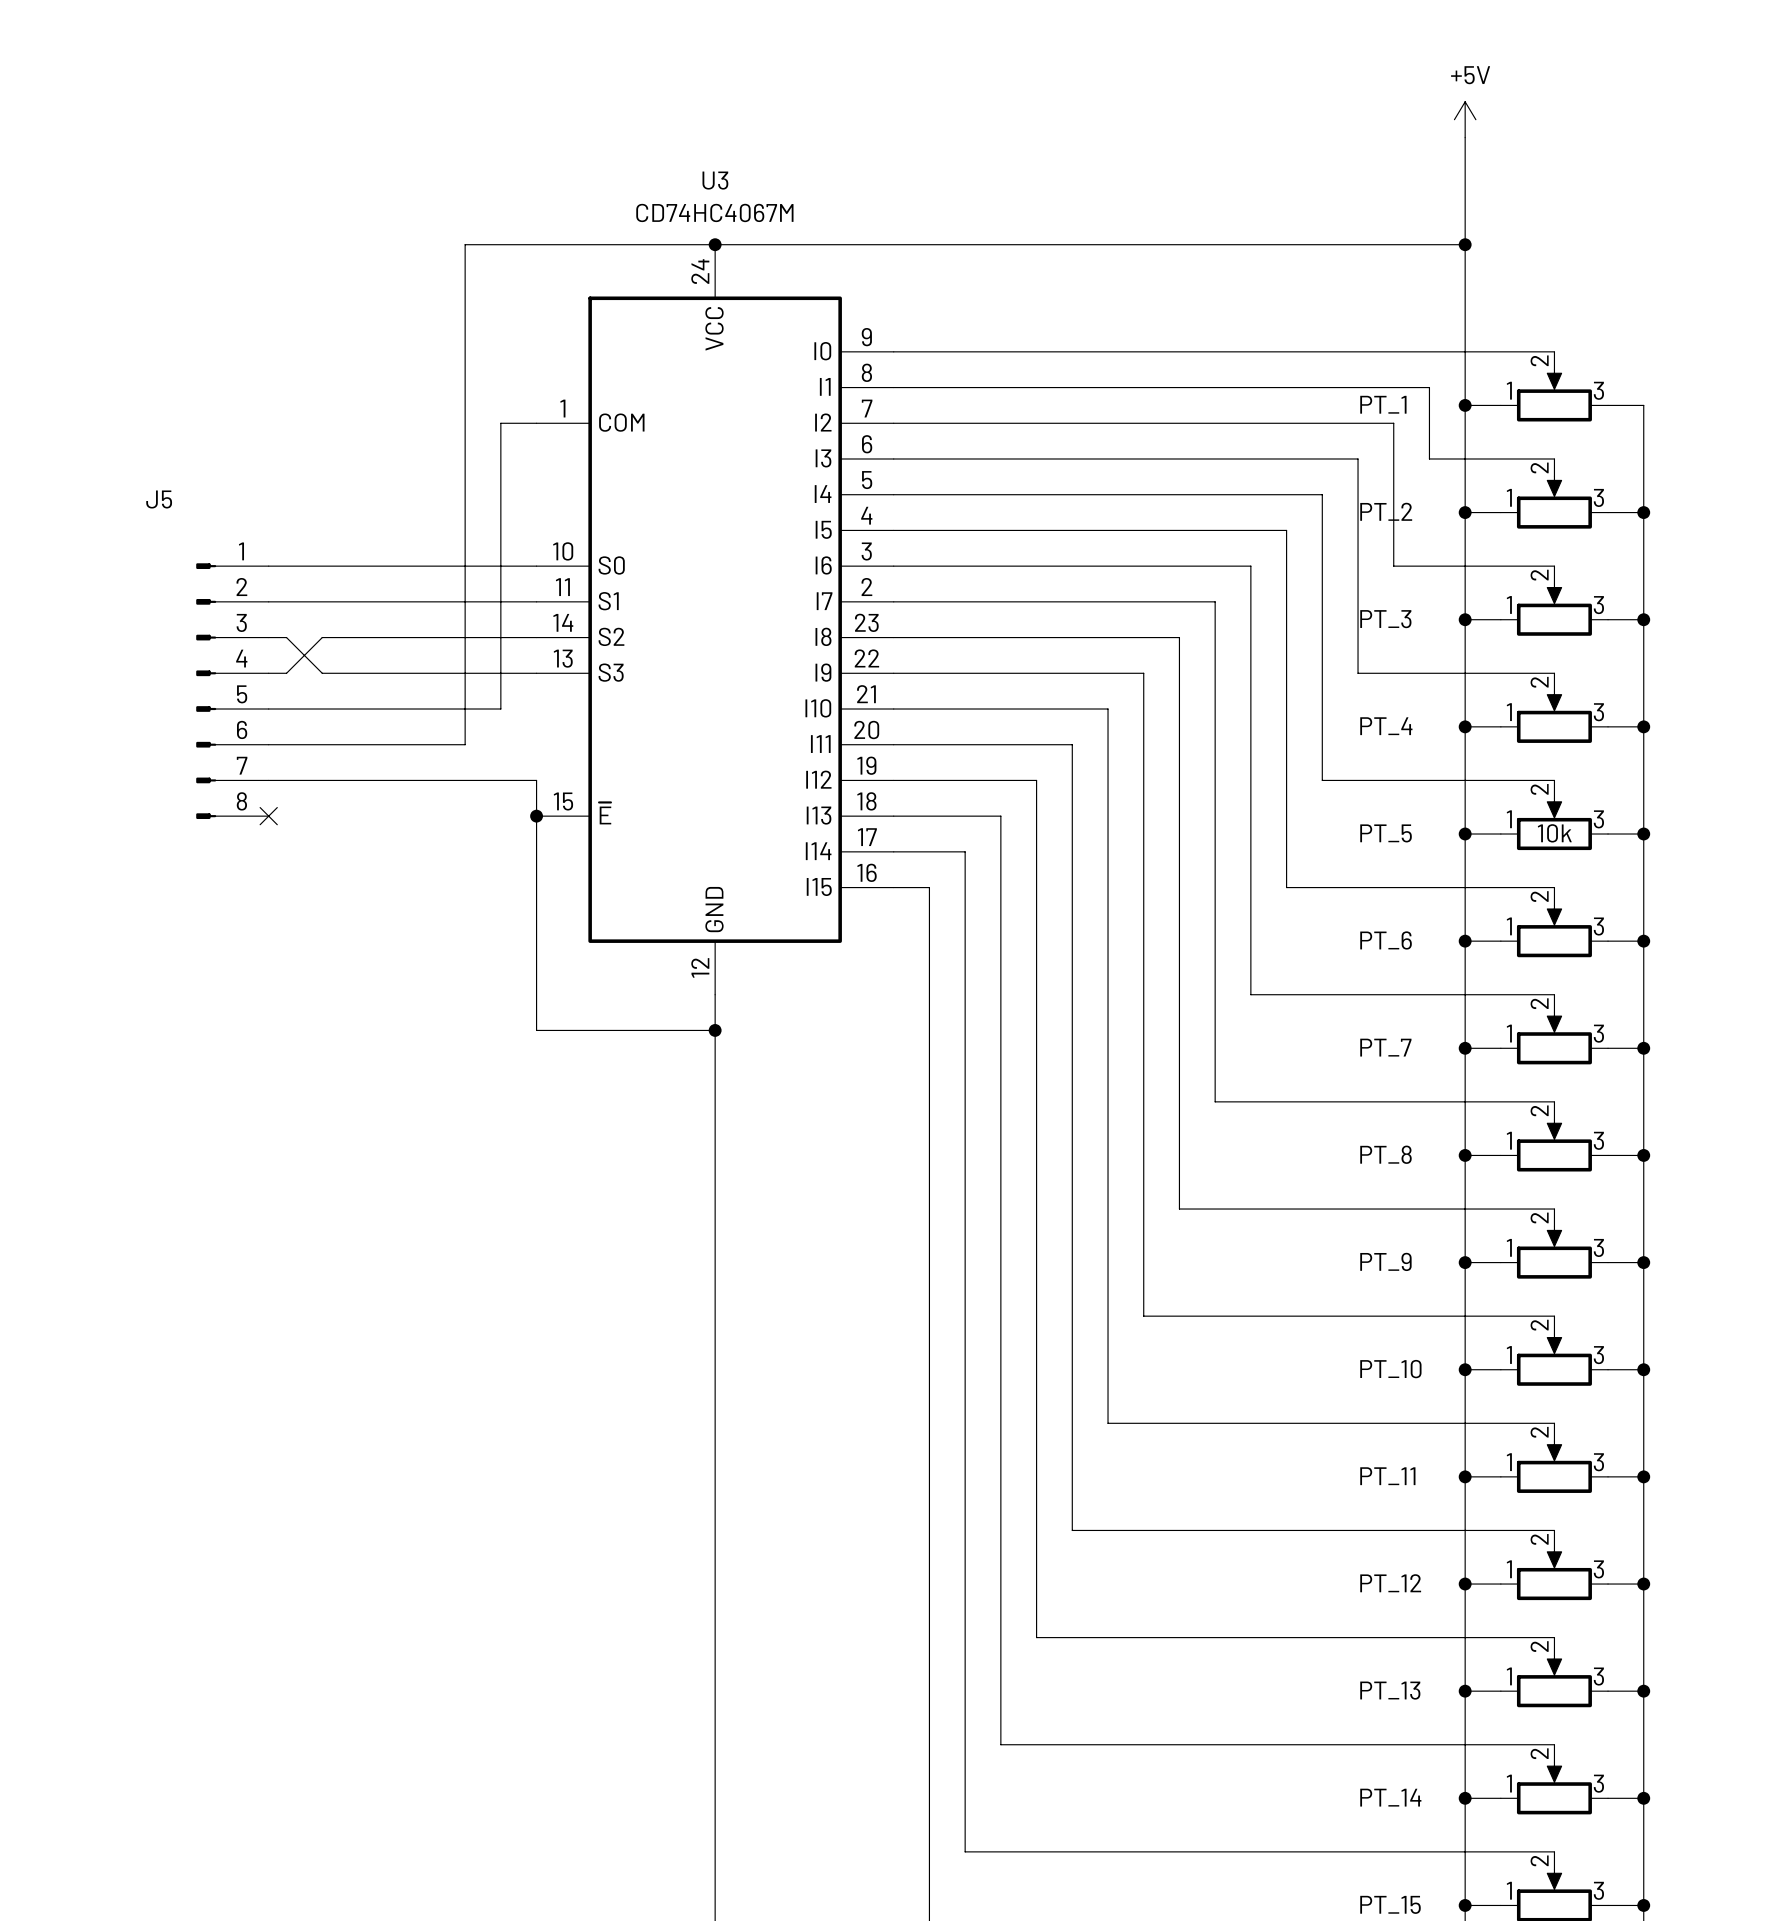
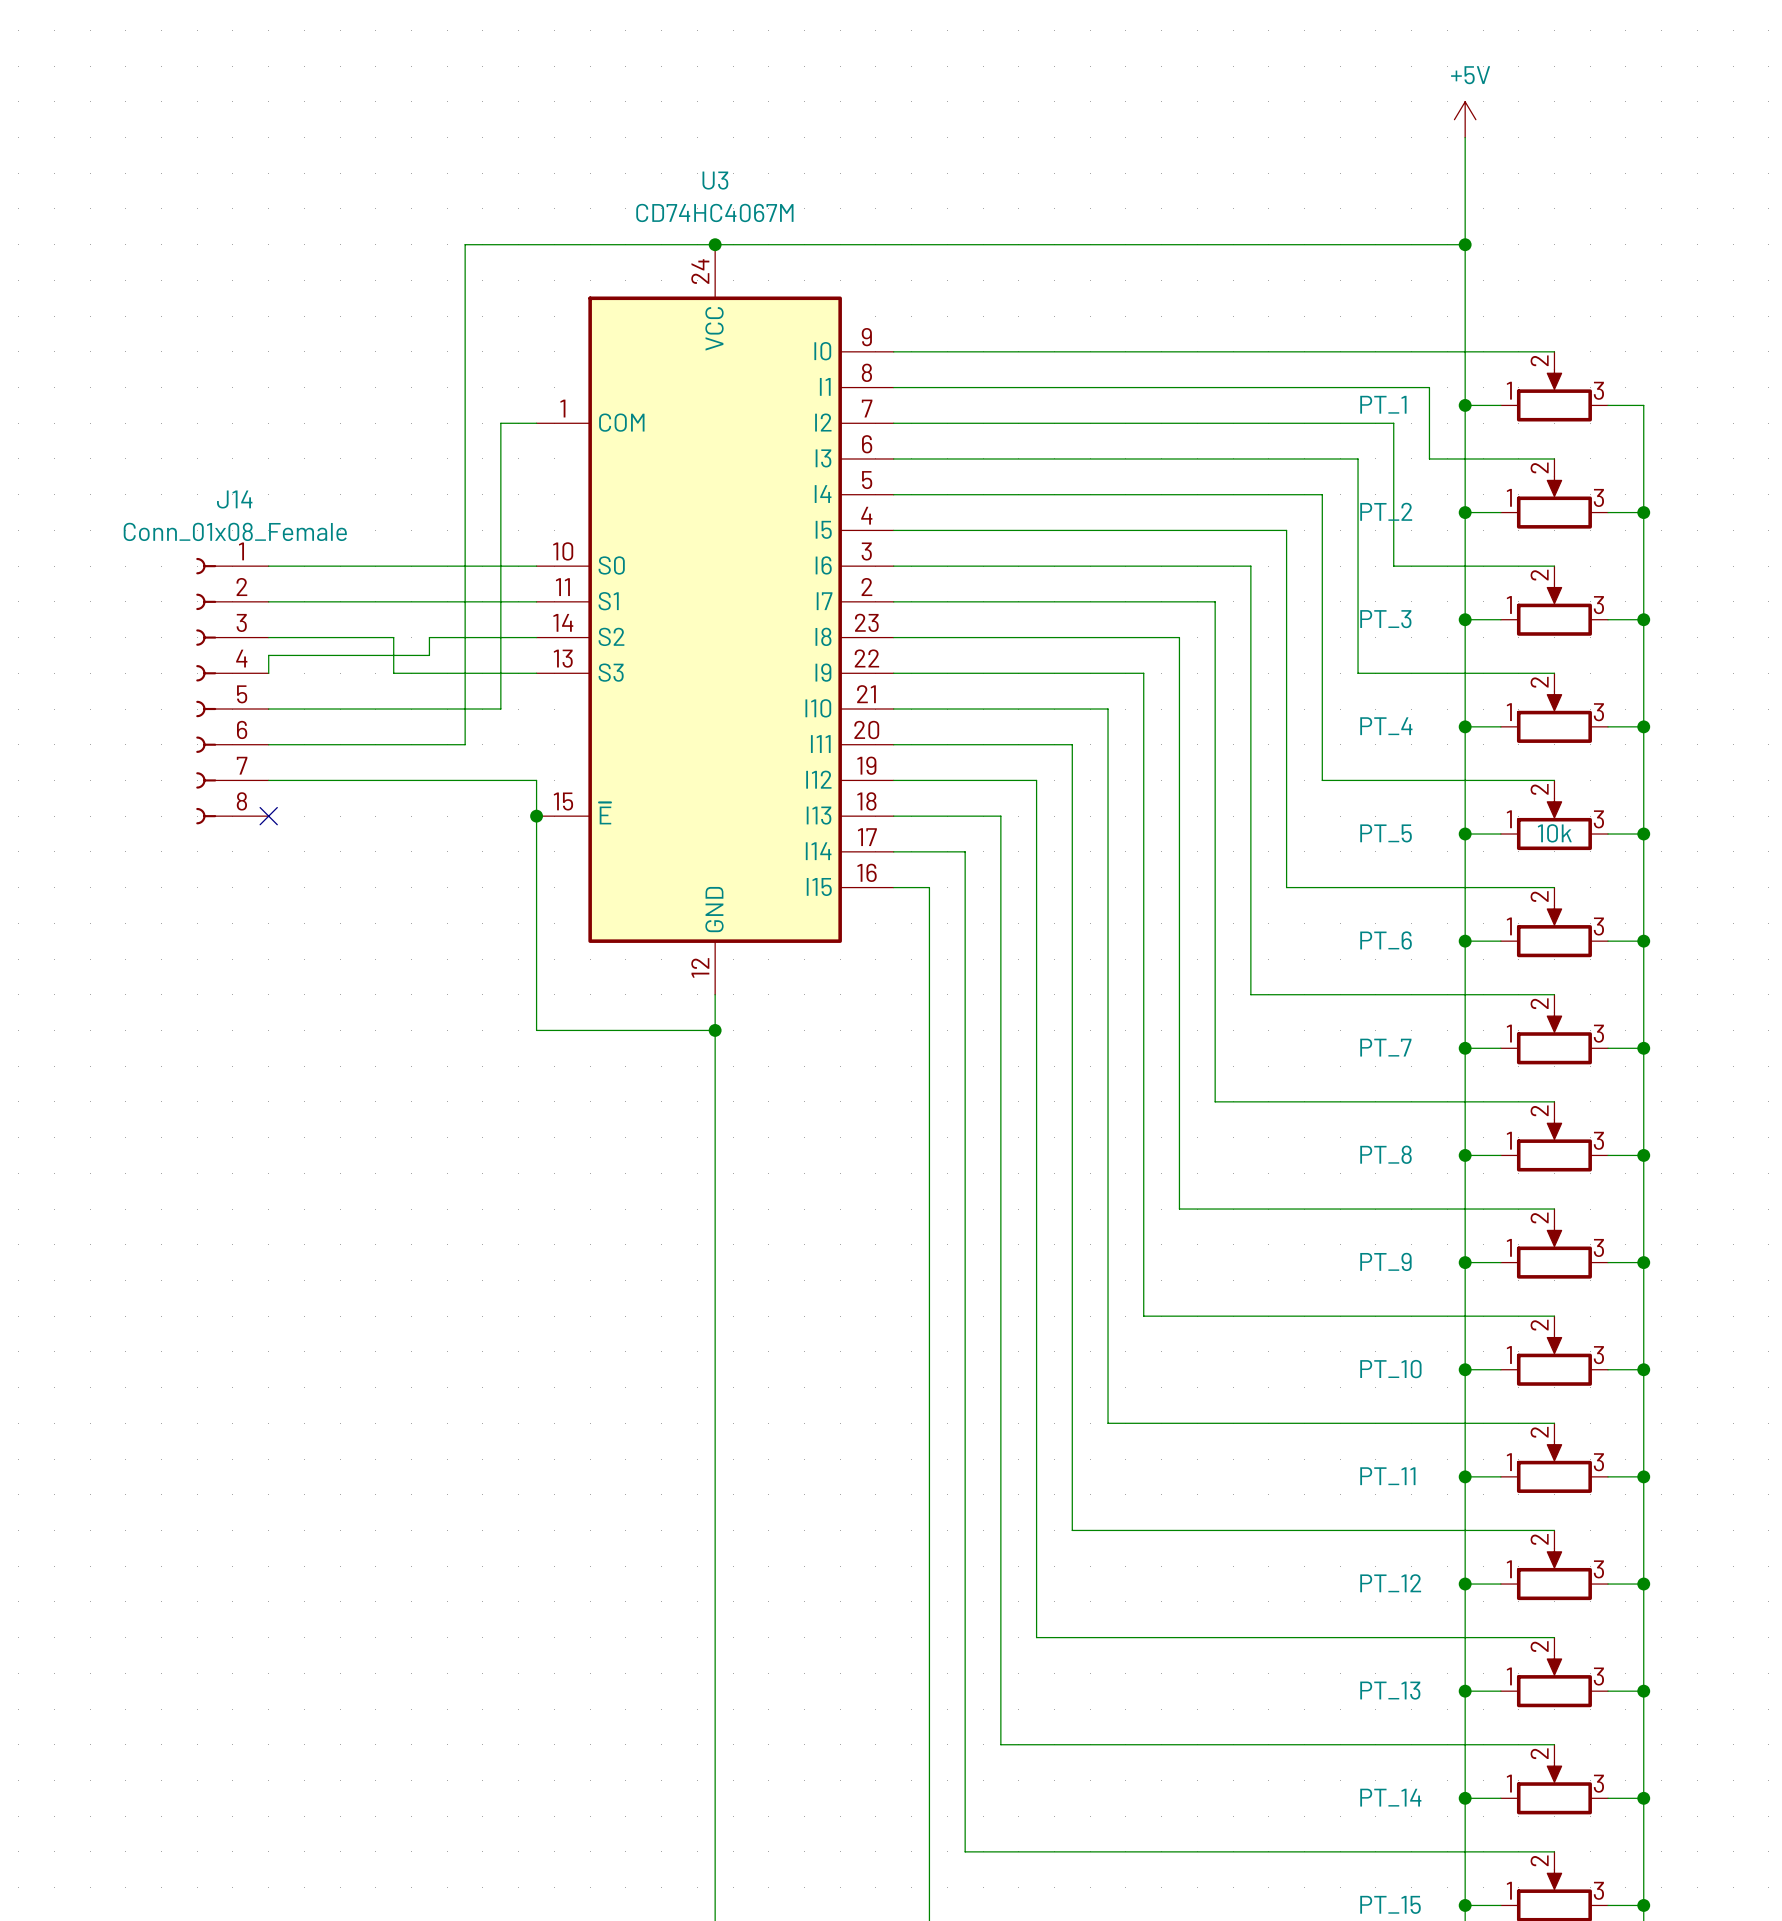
wire: (286, 637) (322, 673) (393, 673) -> none
wire: (322, 637) (286, 673) (268, 673) -> (322, 637) (286, 637)
wire: (393, 637) (429, 637) -> (393, 637) (393, 673)
wire: none -> (429, 637) (429, 655) (268, 655) (268, 673)
J5: (232, 691) -> none
J14: none -> Conn_01x08_Female (232, 691)

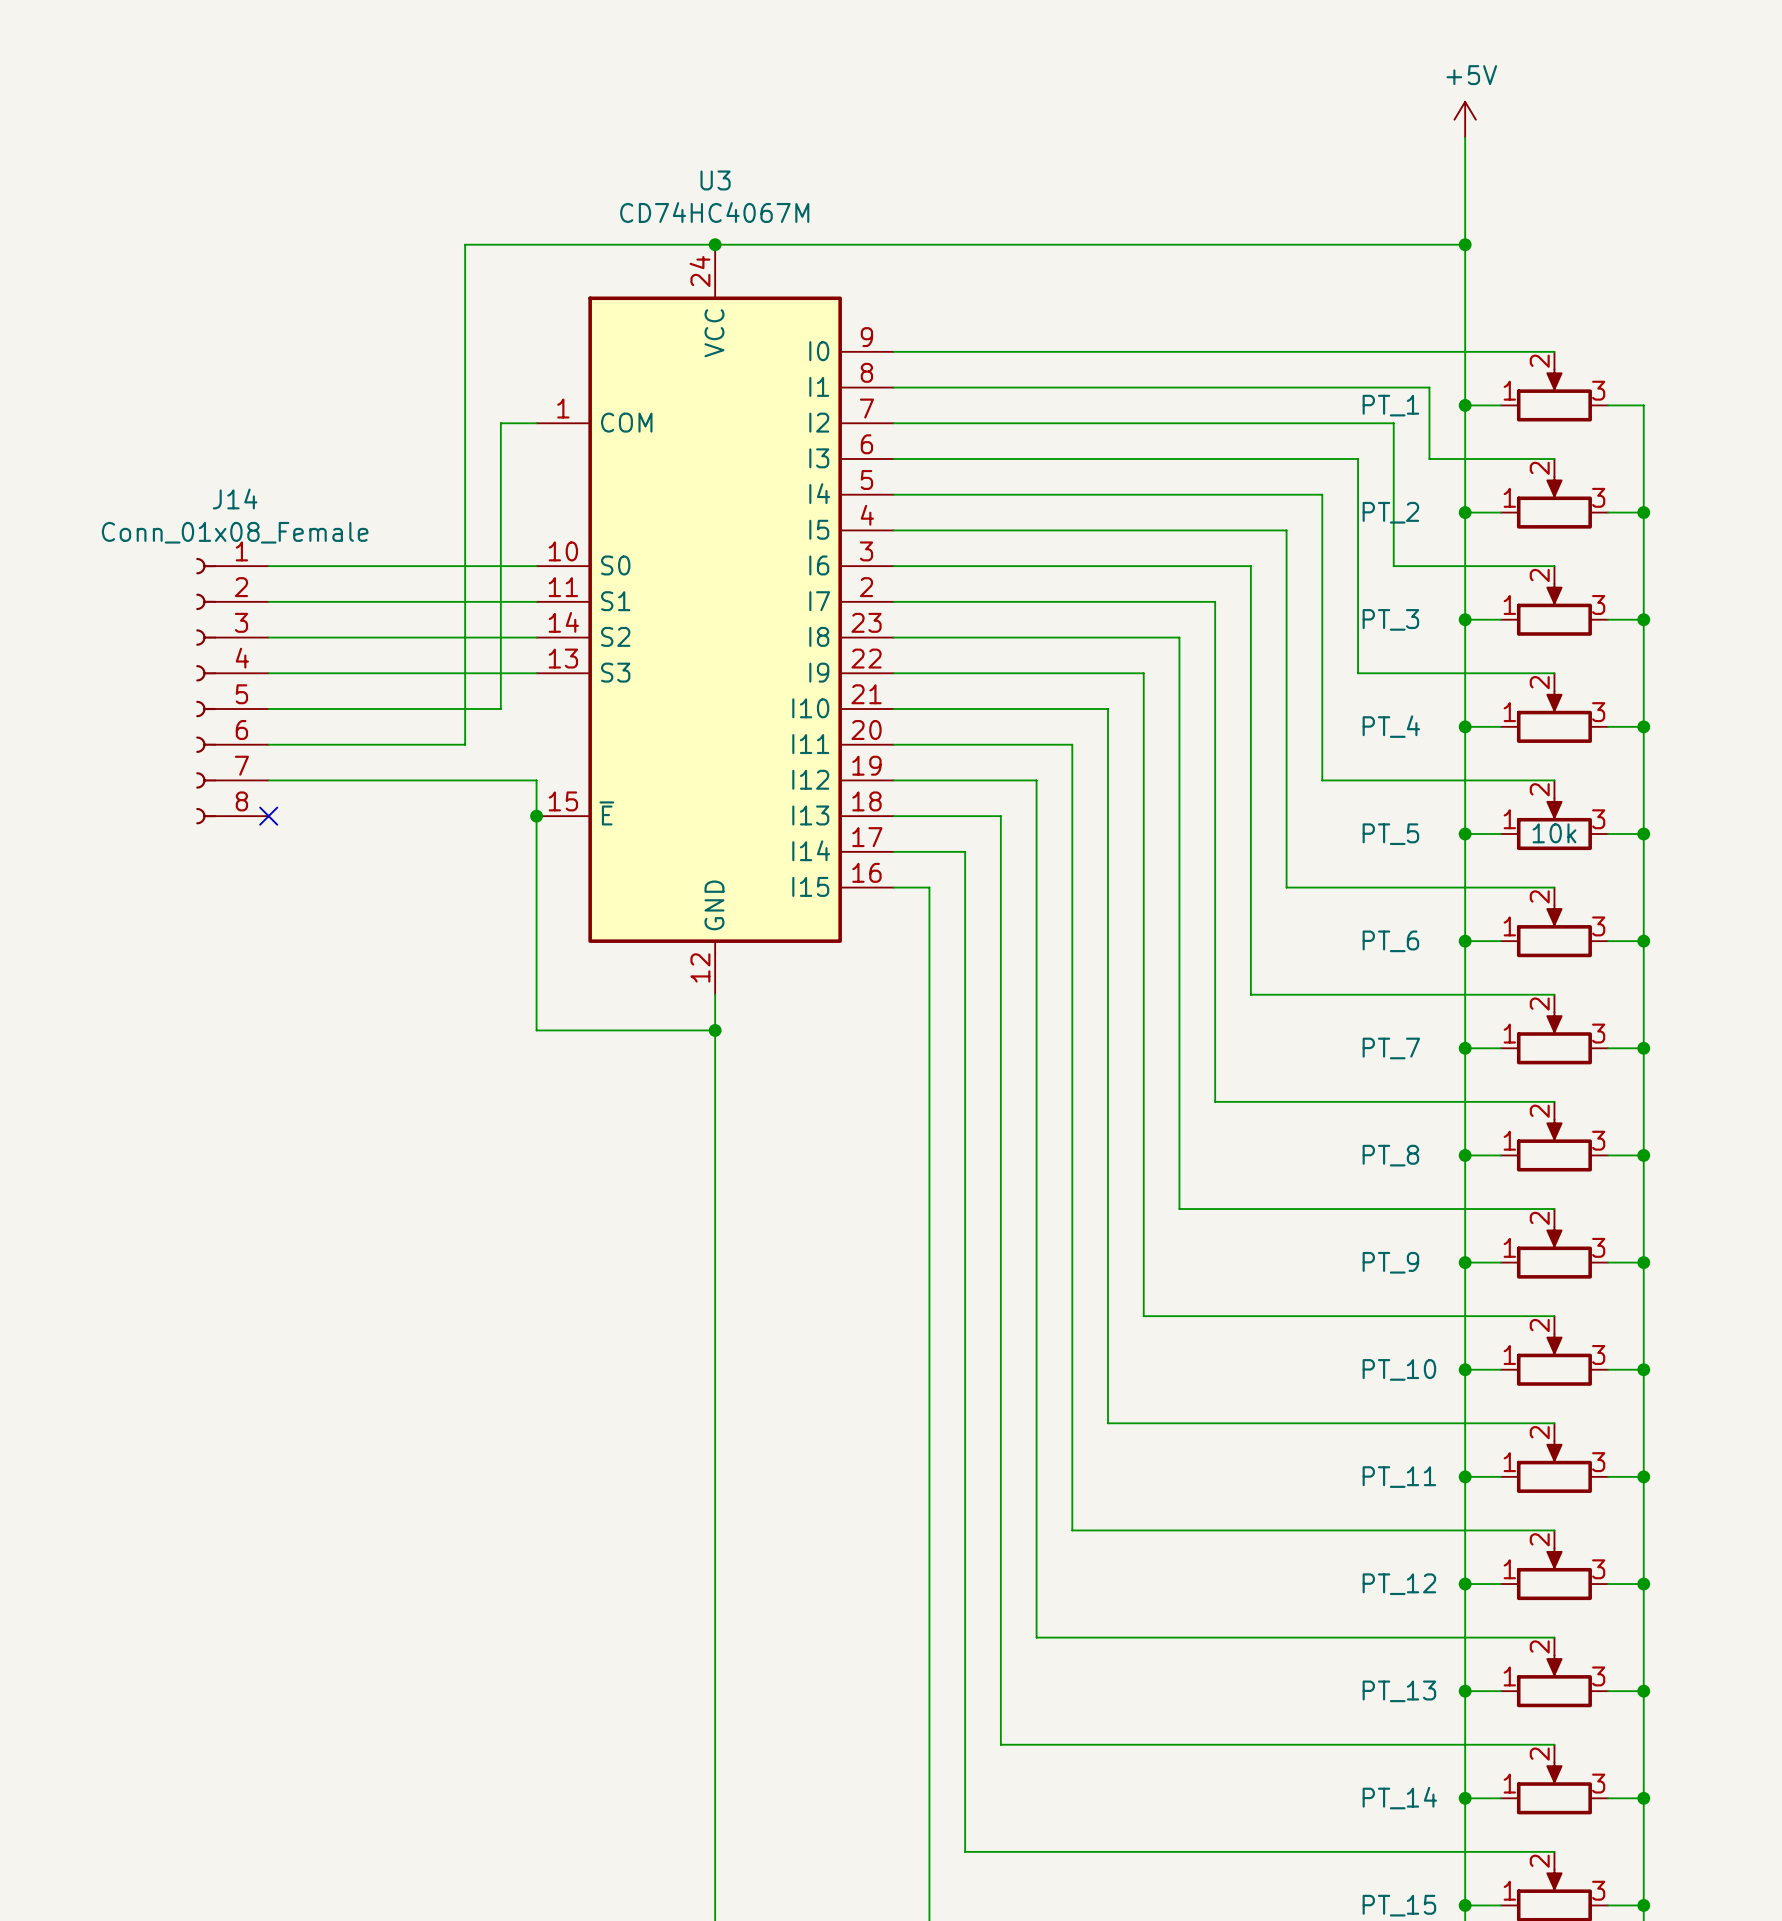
wire: (393, 637) (393, 673) -> (393, 637) (429, 637)
wire: (429, 637) (429, 655) (268, 655) (268, 673) -> (393, 673) (268, 673)

